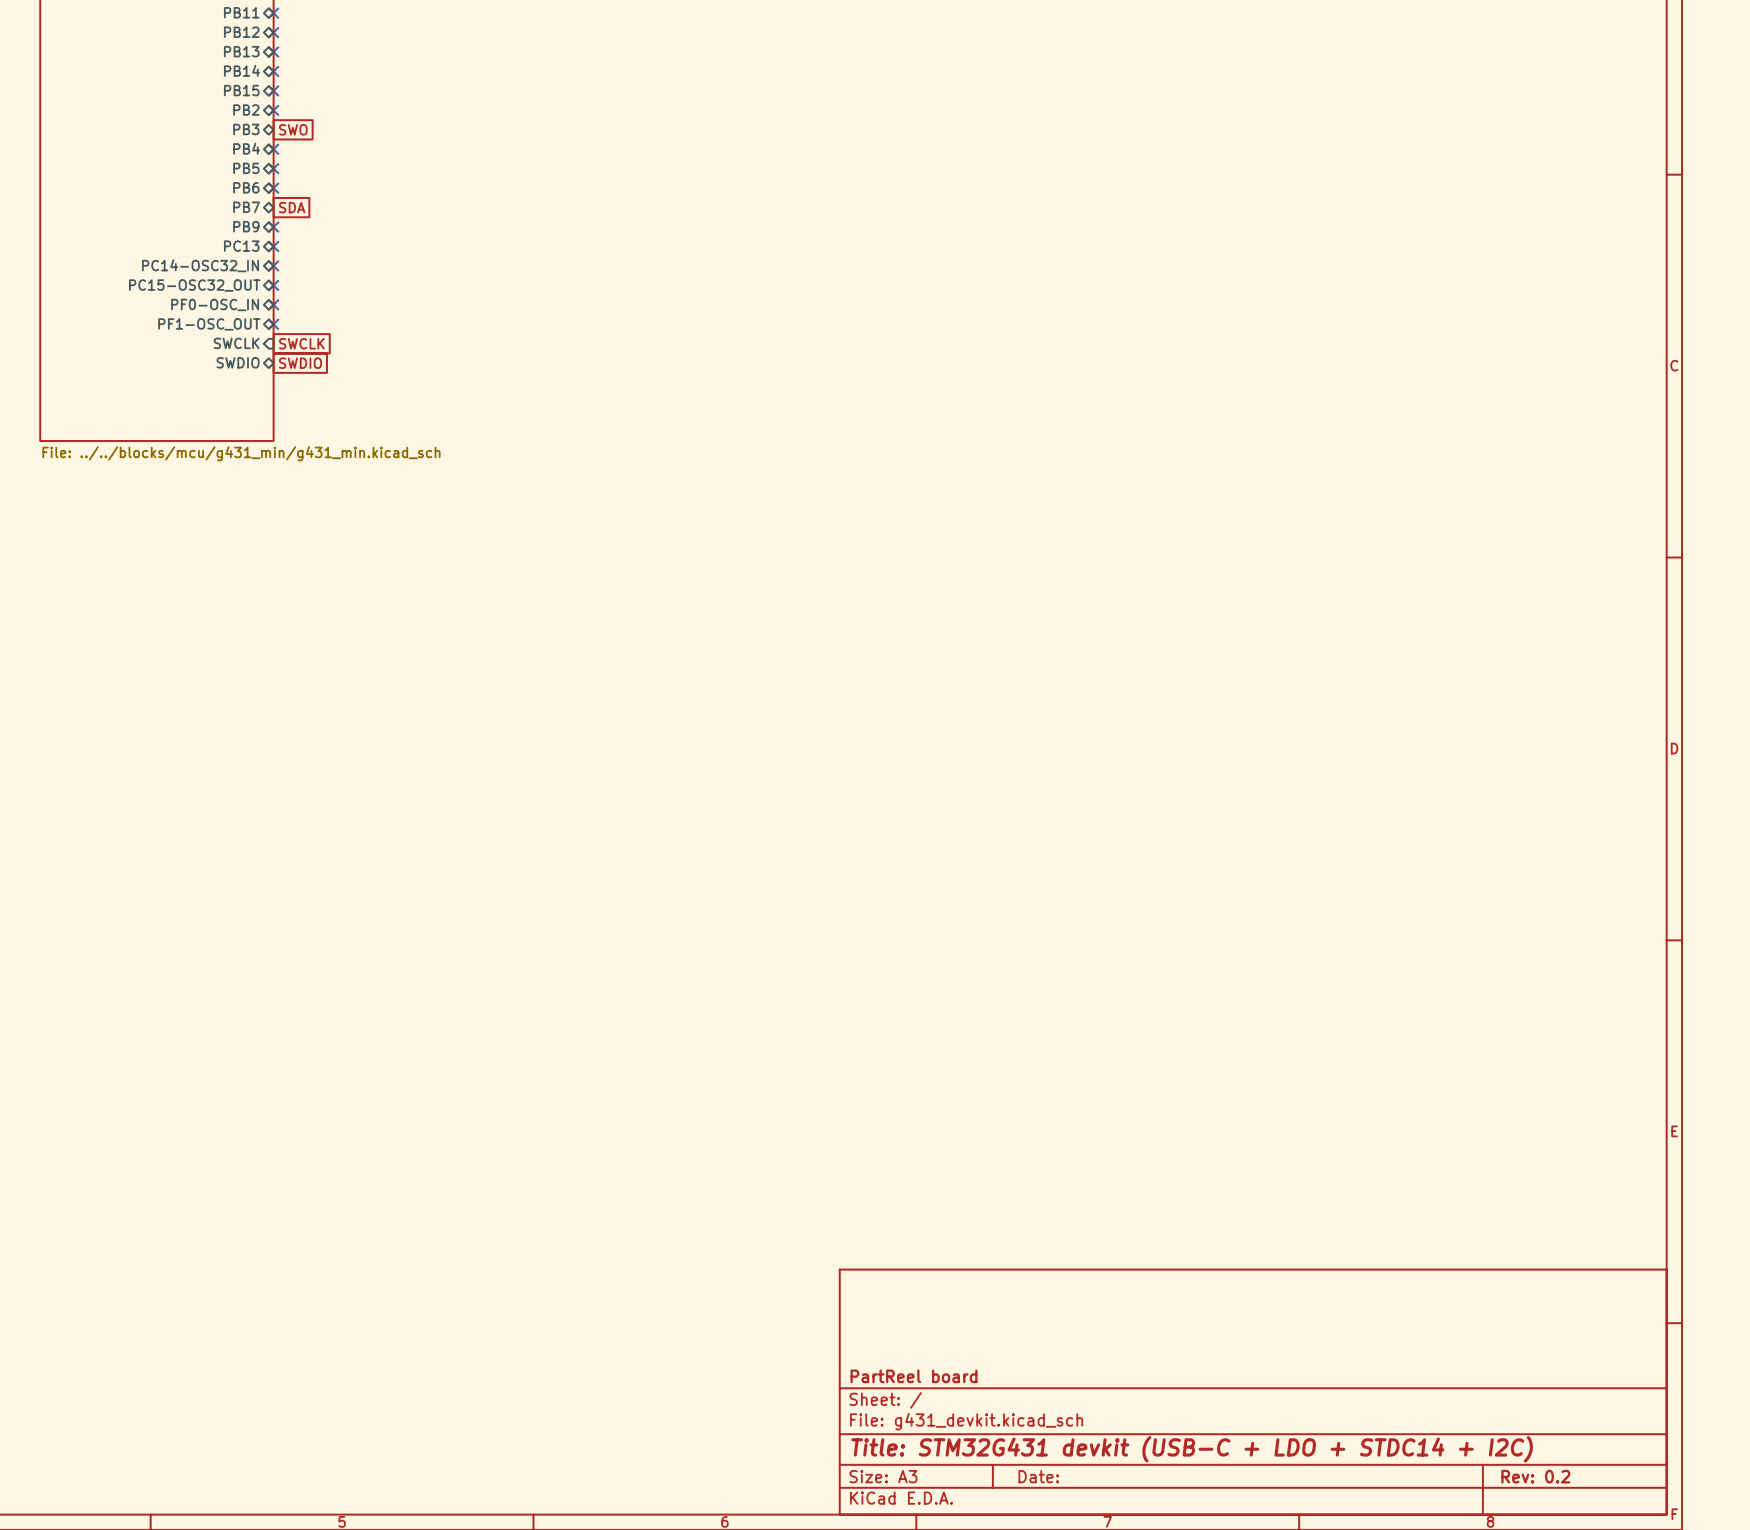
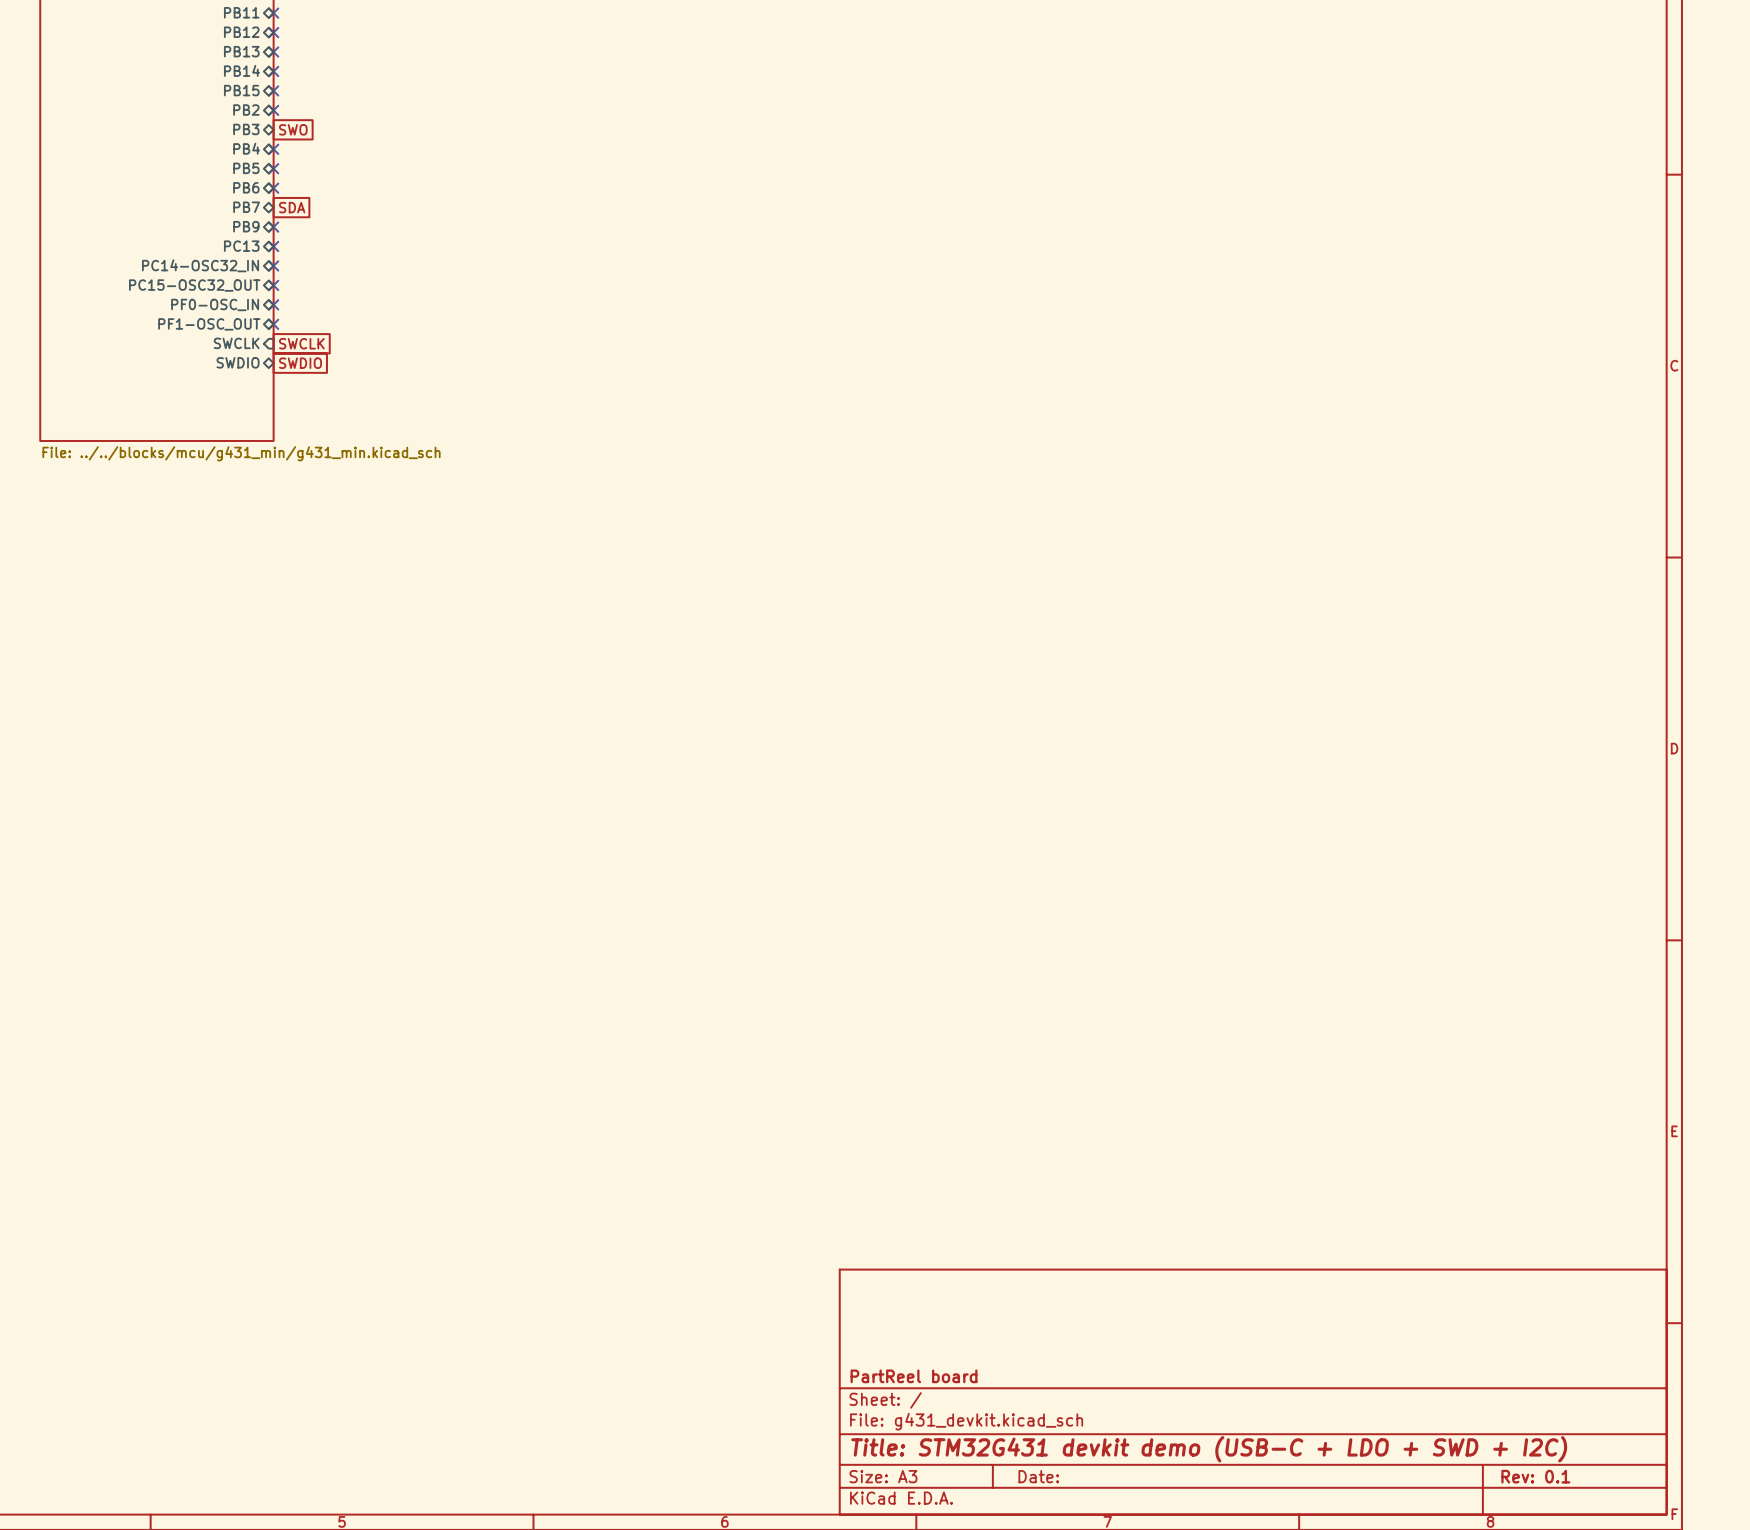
title block: Title: STM32G431 devkit (USB-C + LDO + STDC14 + I2C) (1192, 1449) -> Title: STM32G431 devkit demo (USB-C + LDO + SWD + I2C) (1209, 1449)
title block: Rev: 0.2 (1535, 1476) -> Rev: 0.1 (1535, 1476)

